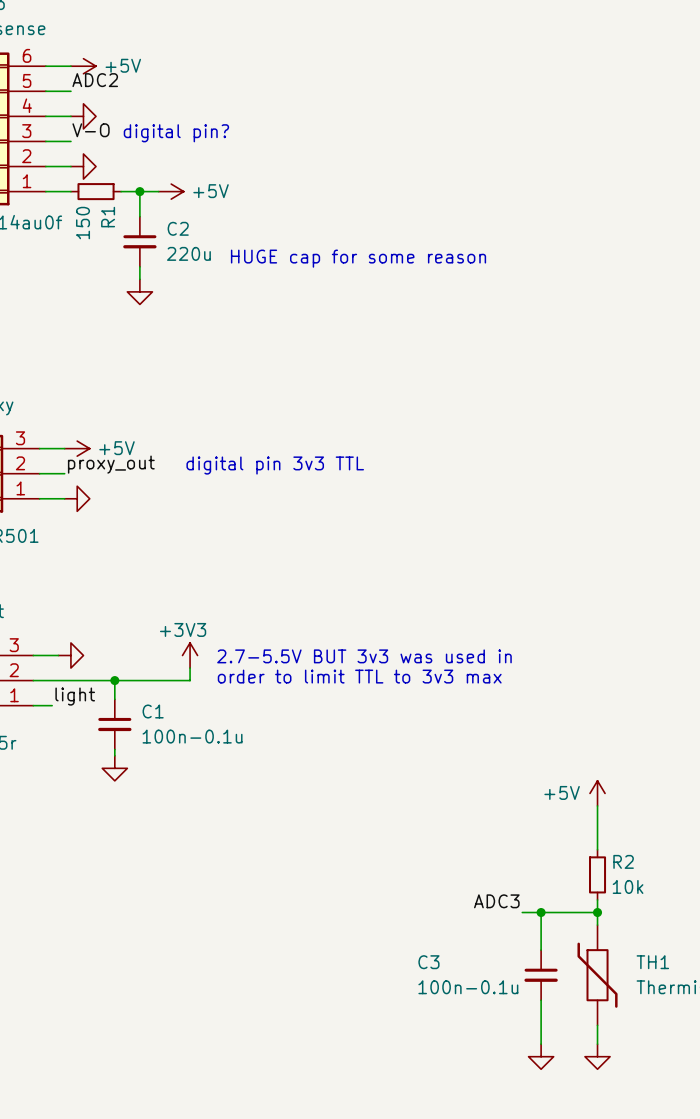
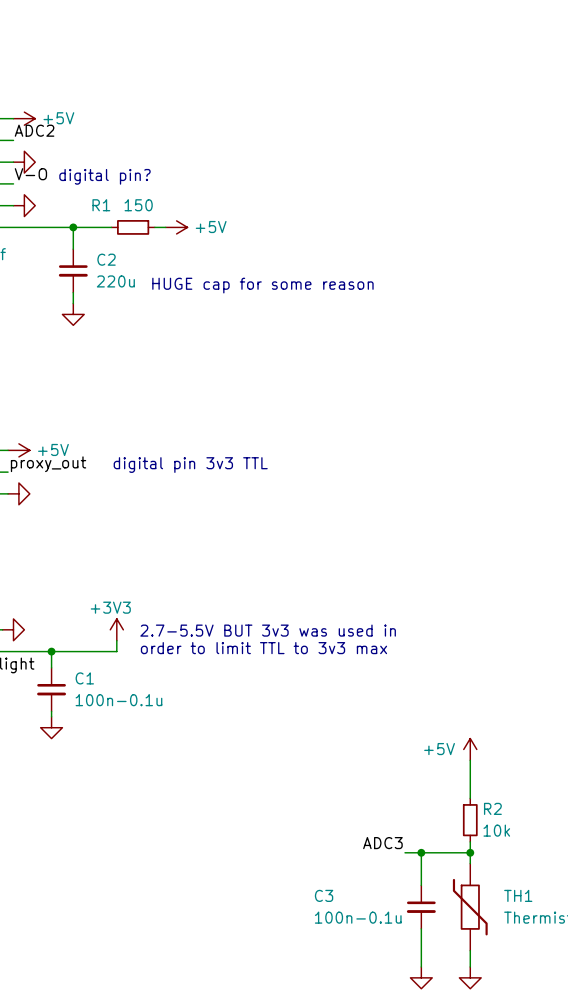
wire: none -> (13, 227) (56, 227)
R1 position: (96, 191) -> (133, 227)
power symbol position: +5V (171, 191) -> +5V (176, 227)
wire: none -> (154, 227) (165, 227)
R1 name rotation: 0° (108, 217) -> 90° clockwise (101, 205)
R1 name position: R1 (108, 217) -> R1 (101, 205)
R1 value rotation: 0° (83, 223) -> 90° clockwise (138, 205)
R1 value position: 150 (83, 223) -> 150 (138, 205)

